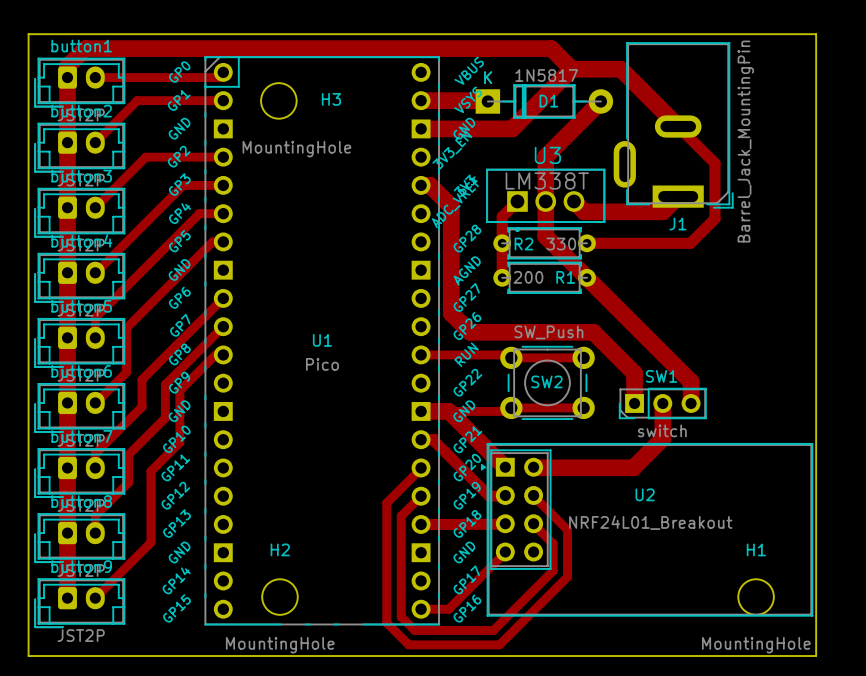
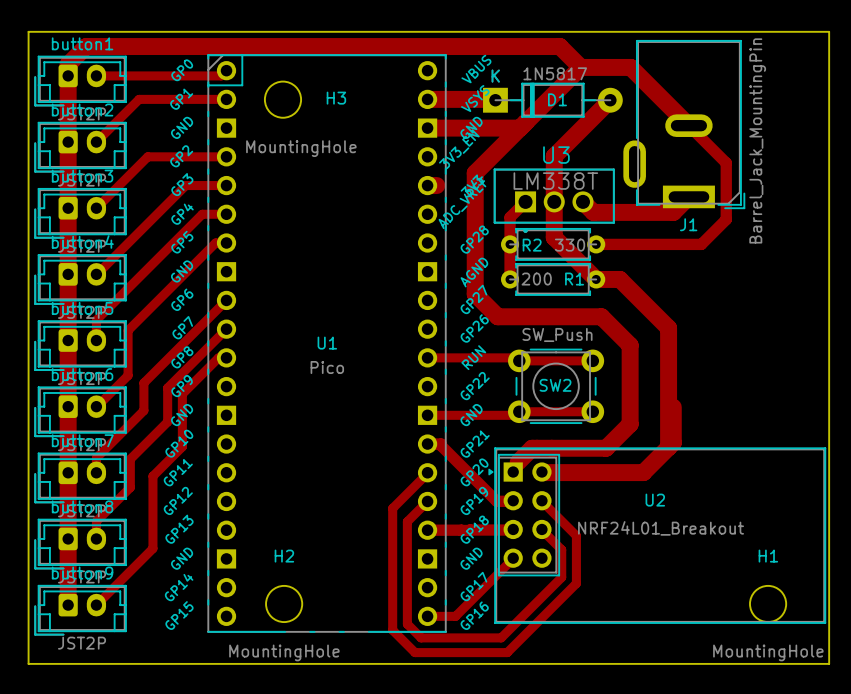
top track: none -> (520, 128) (475, 173) (475, 294) (497, 316) (601, 316) (630, 345) (630, 424) (606, 448) (532, 448) (518, 462)
top track: (430, 185) (451, 206) (451, 313) (470, 332) (593, 332) (634, 373) (634, 403) -> none
top track: (586, 277) (691, 381) (691, 403) -> (596, 279) (619, 279) (668, 328) (668, 447)
SW1: switch (662, 403) -> none
top track: (421, 411) (449, 411) (505, 467) -> none

